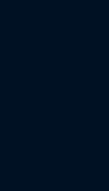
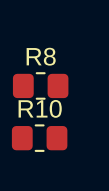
R8: none -> (40, 85)
R10: none -> (39, 138)

